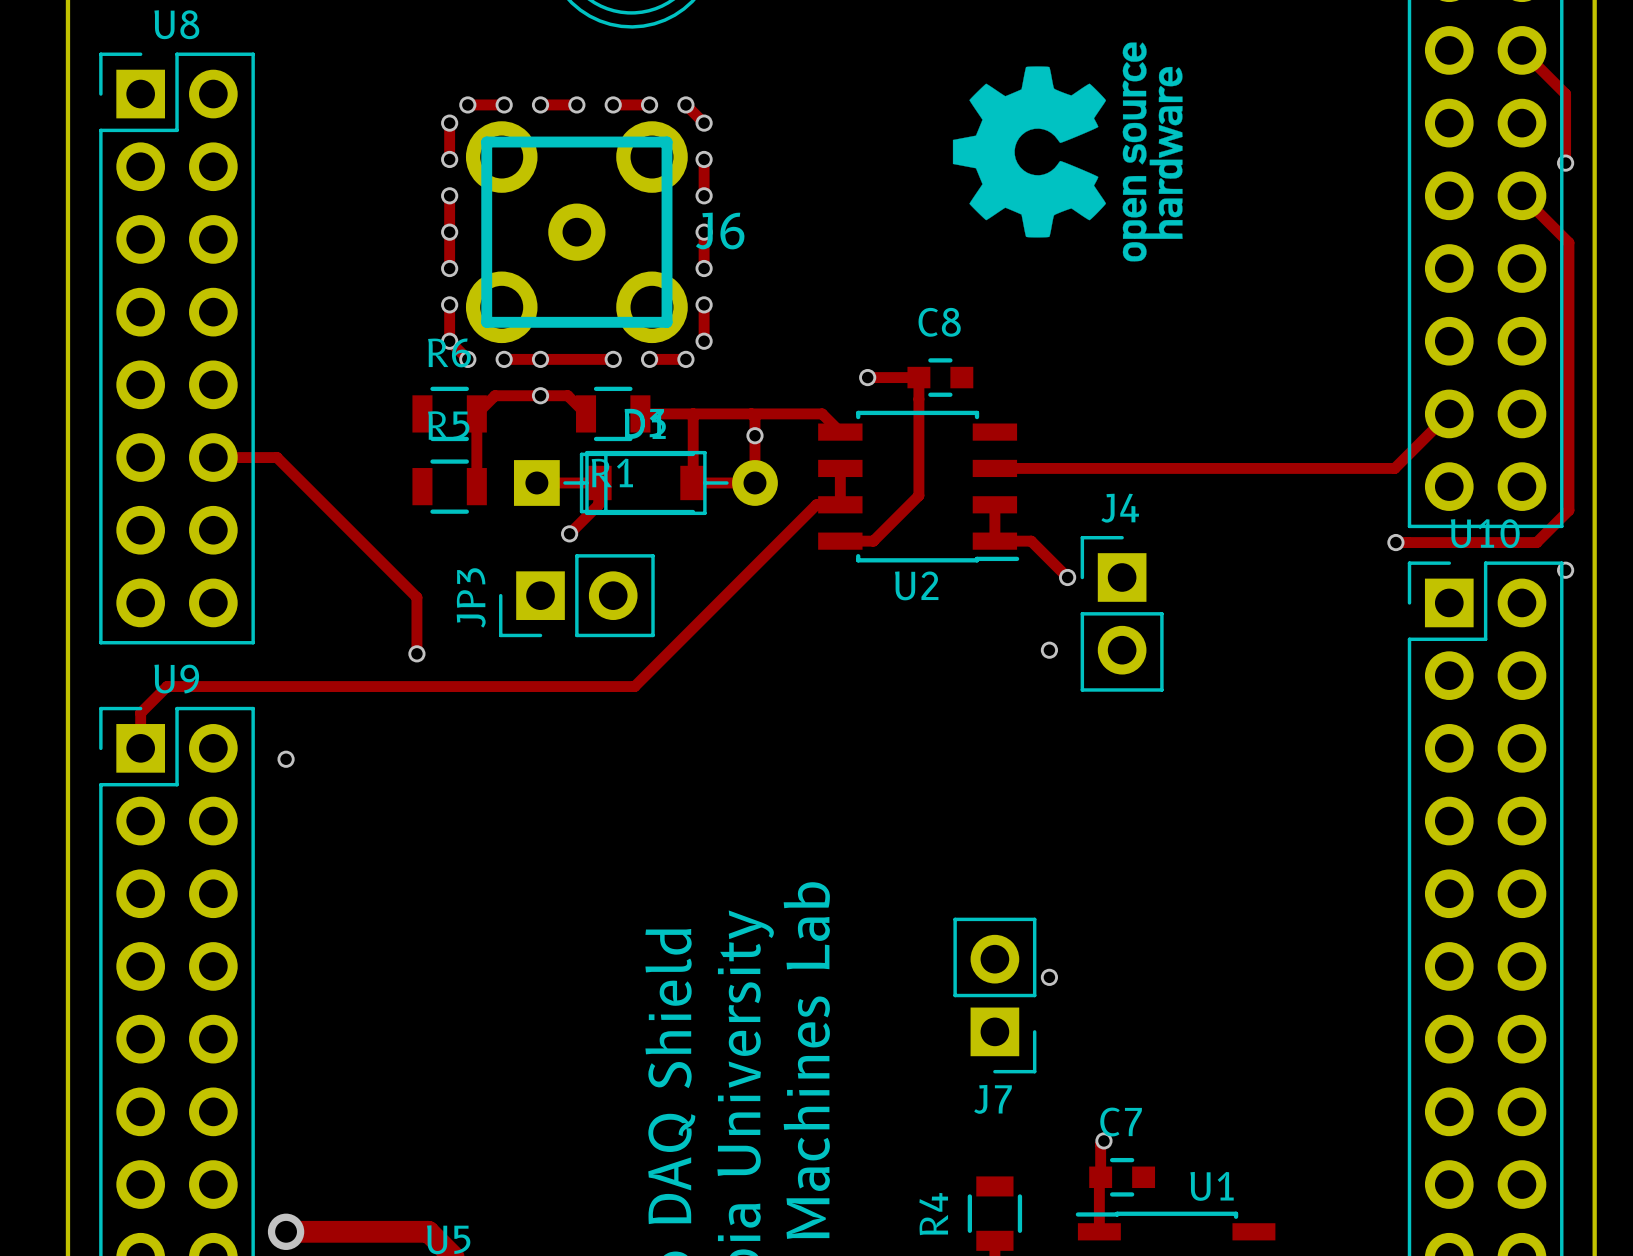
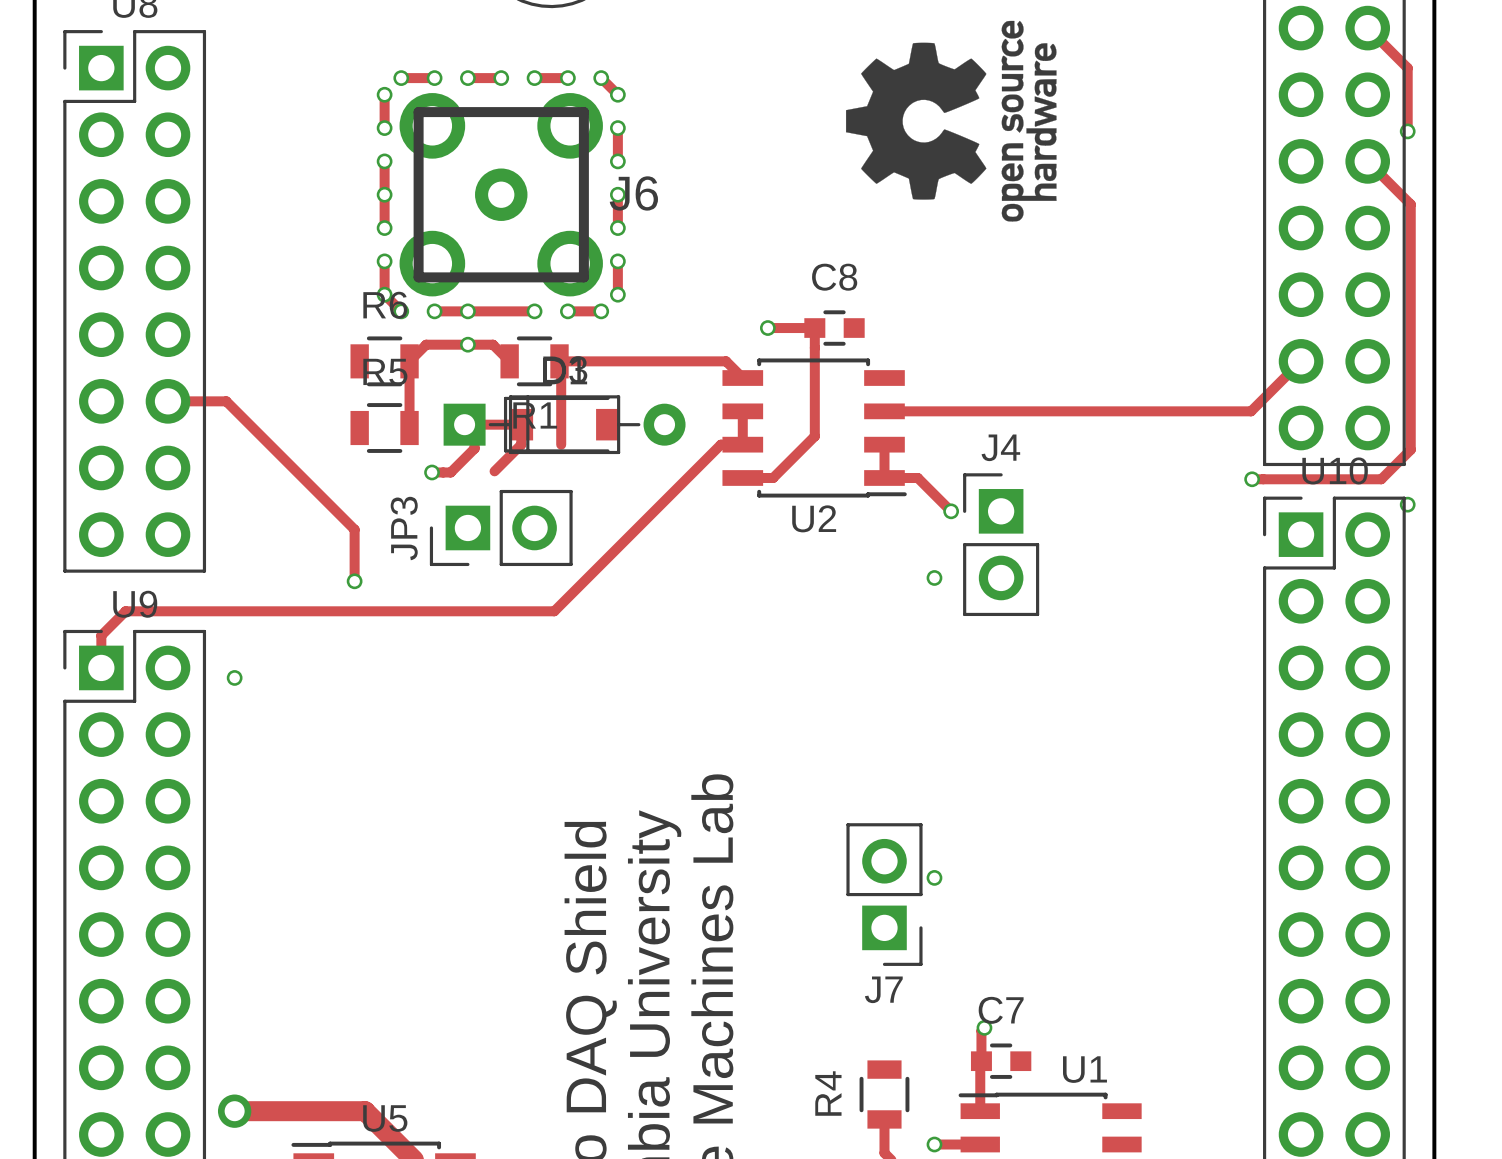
track: (693, 413) (693, 482) (754, 482) (754, 417) (751, 413) -> none
track: none -> (561, 363) (561, 444)
via: (754, 435) -> none
track: none -> (474, 444) (474, 448) (450, 472) (432, 472)
via position: (569, 533) -> (432, 472)

